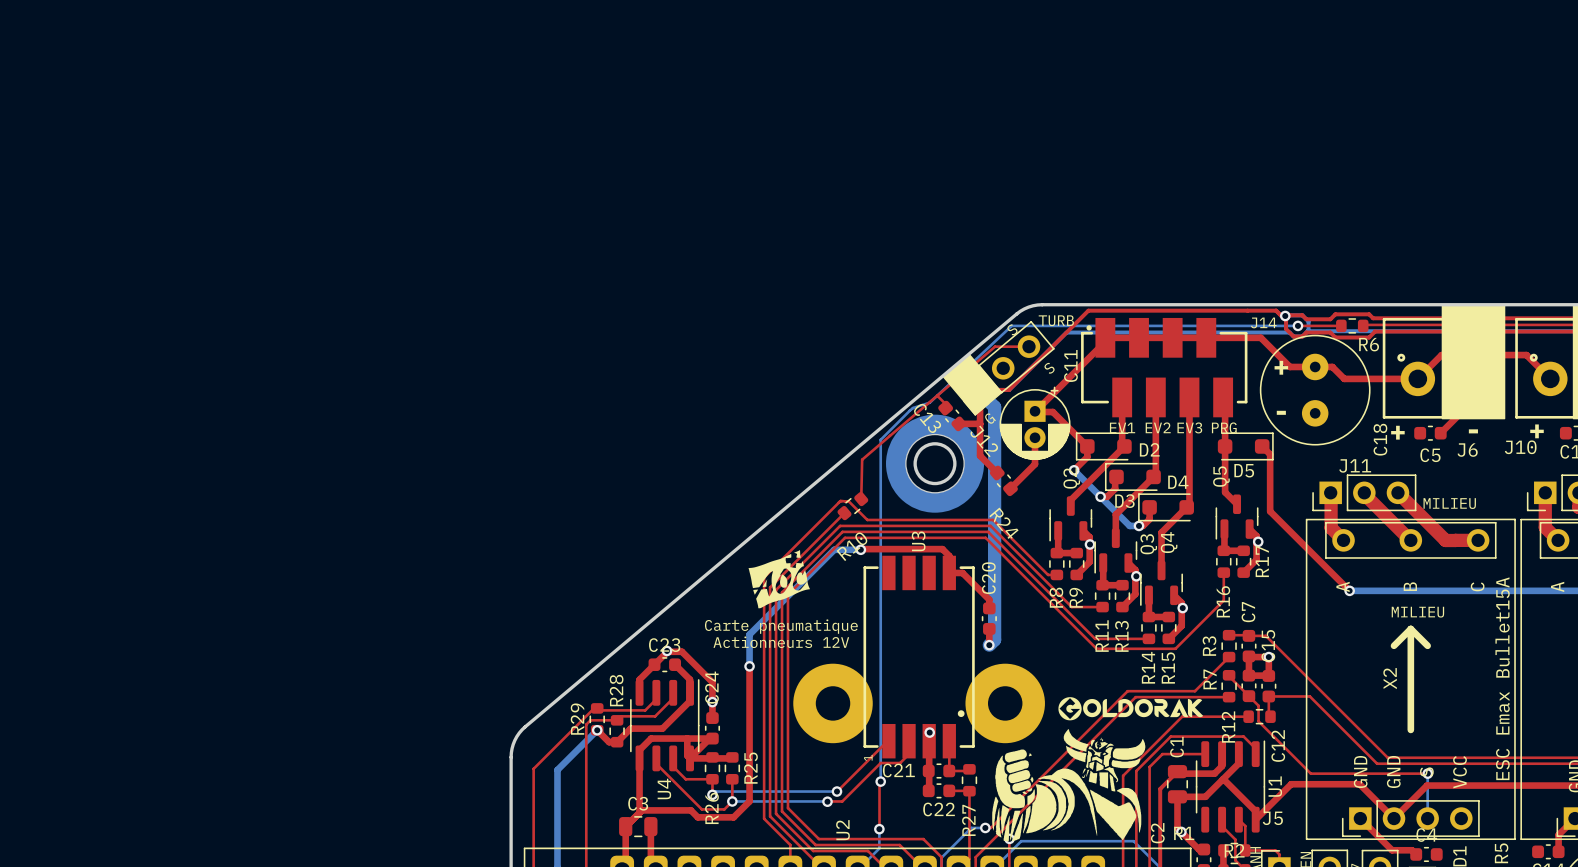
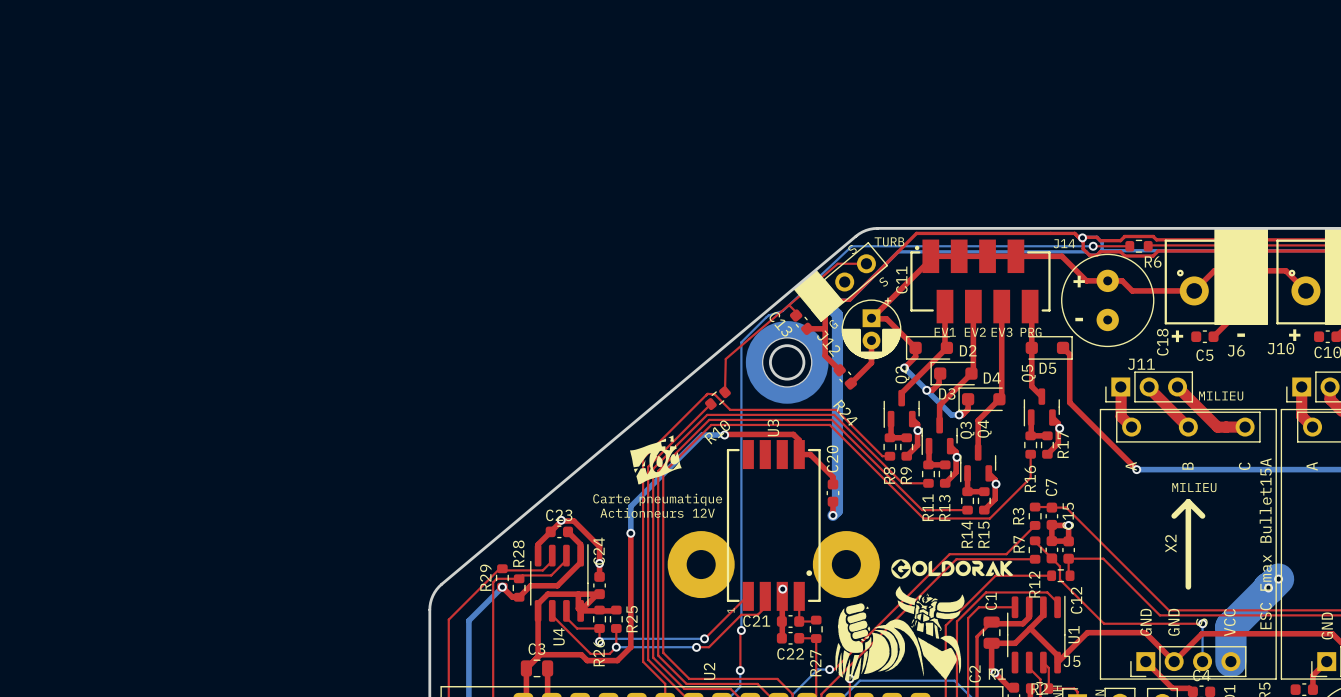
bottom track: none -> (1278, 579) (1230, 626) (1230, 661)
via: none -> (1278, 579)
via: none -> (1268, 588)

